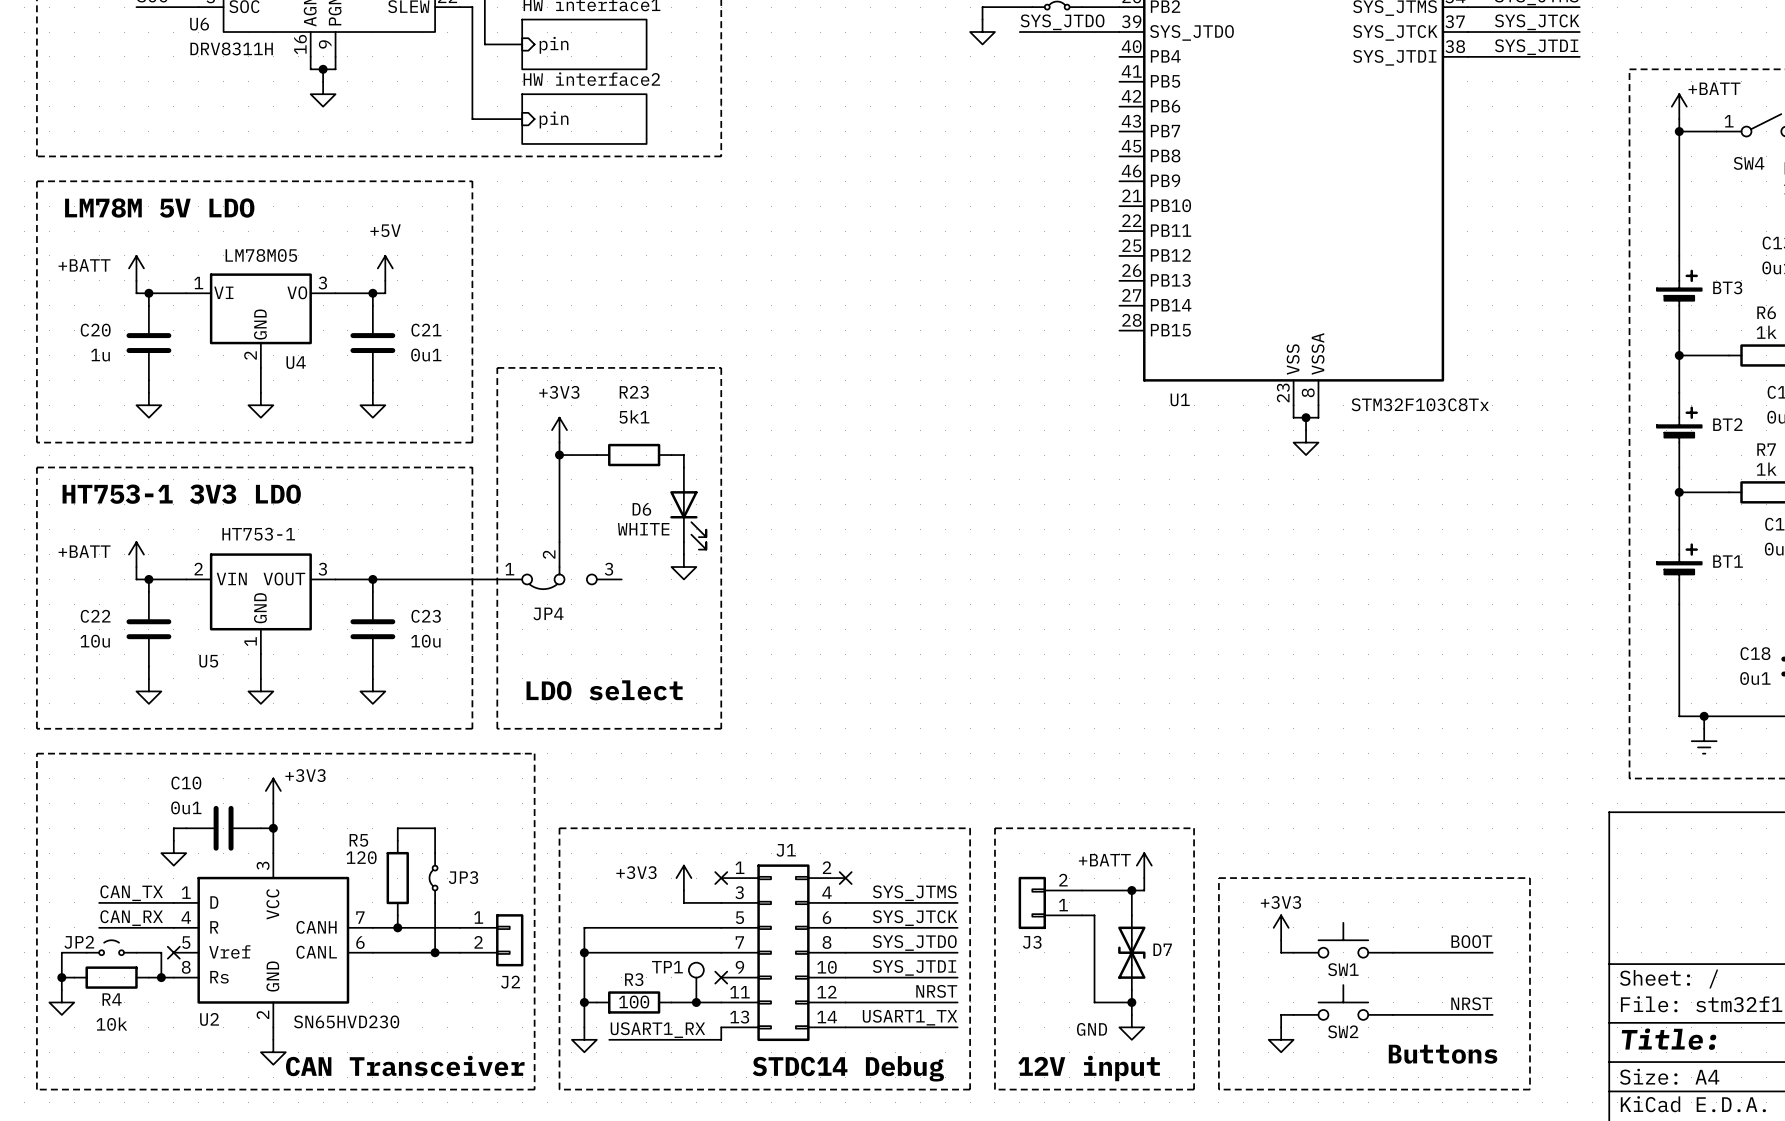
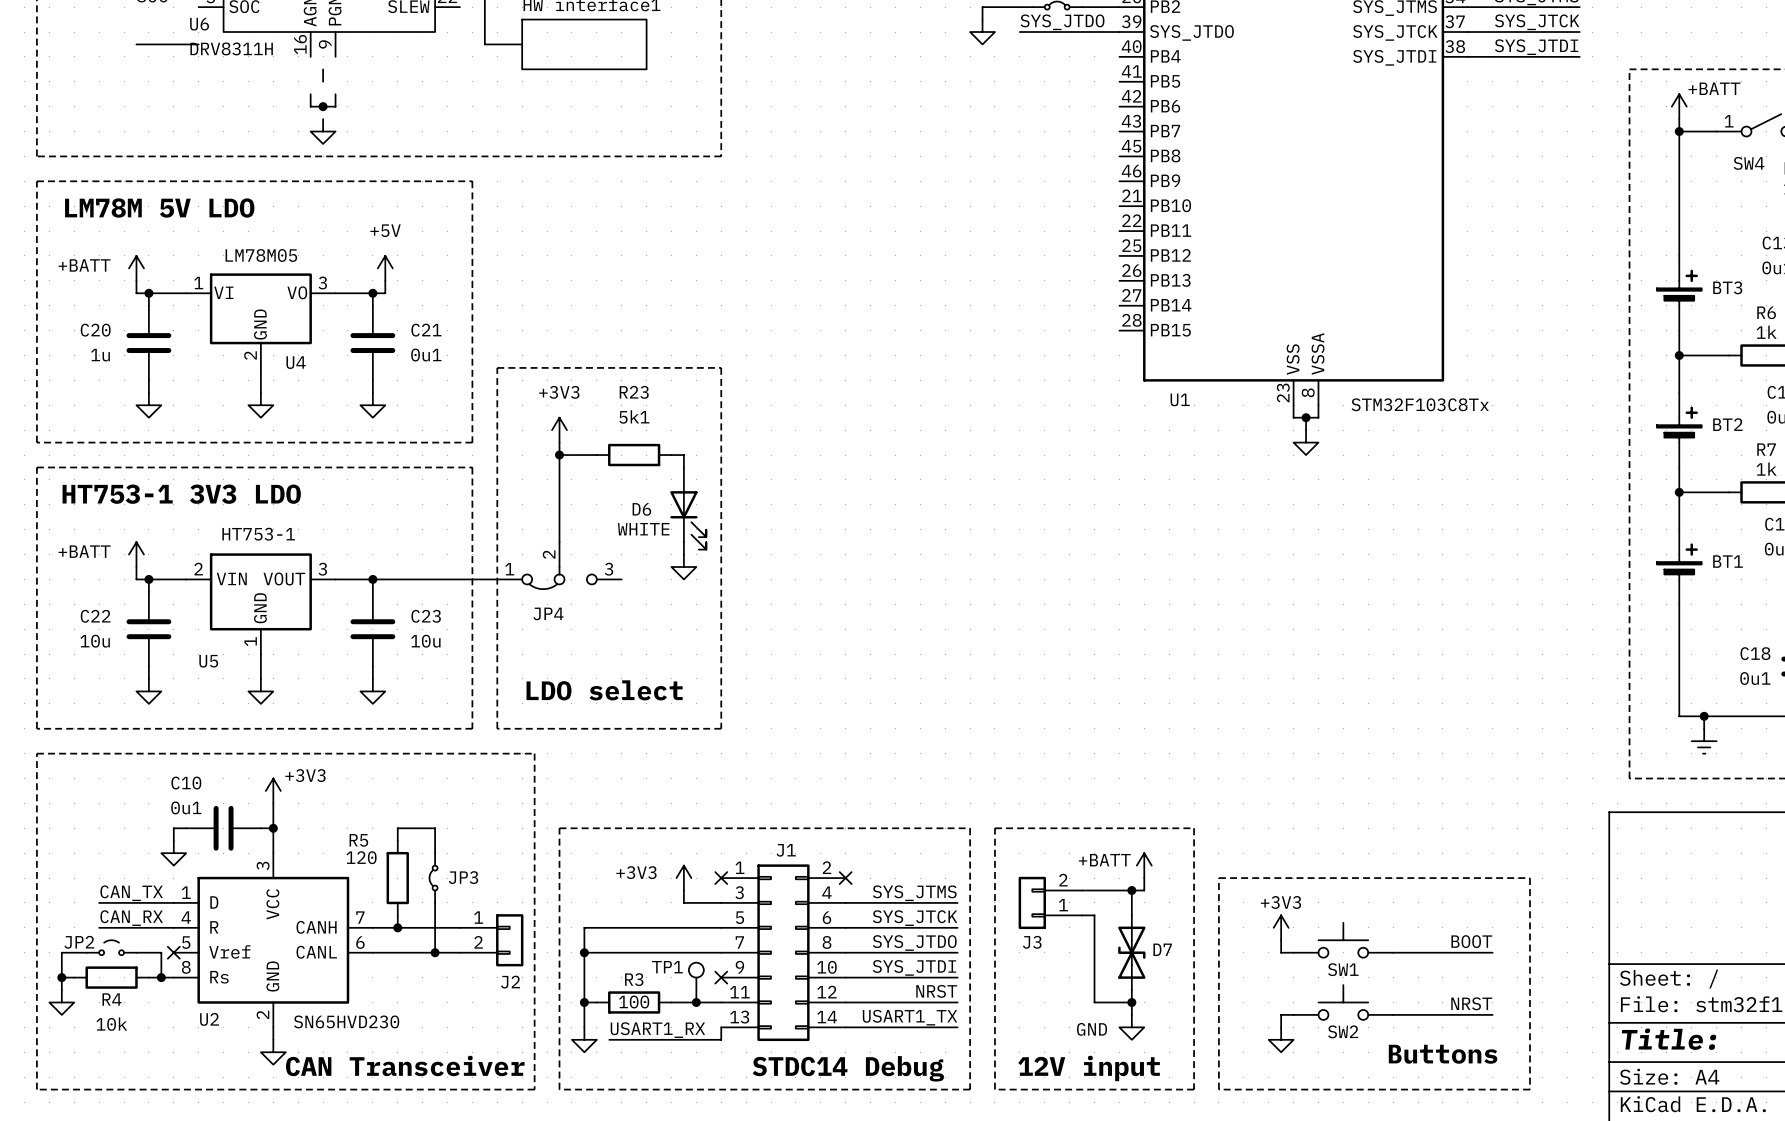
wire: (136, 7) (198, 7) -> (136, 44) (198, 44)
wire: (459, 7) (472, 7) (472, 119) (522, 119) -> none
sheet pin: pin (554, 45) -> none
wire: (310, 56) (310, 69) (335, 69) (335, 56) -> (310, 94) (310, 106) (335, 106) (335, 94)
junction position: (323, 69) -> (323, 106)
power symbol position: (323, 94) -> (323, 131)
sheet pin: pin (554, 119) -> none
sheet HW interface2: (584, 119) -> none

